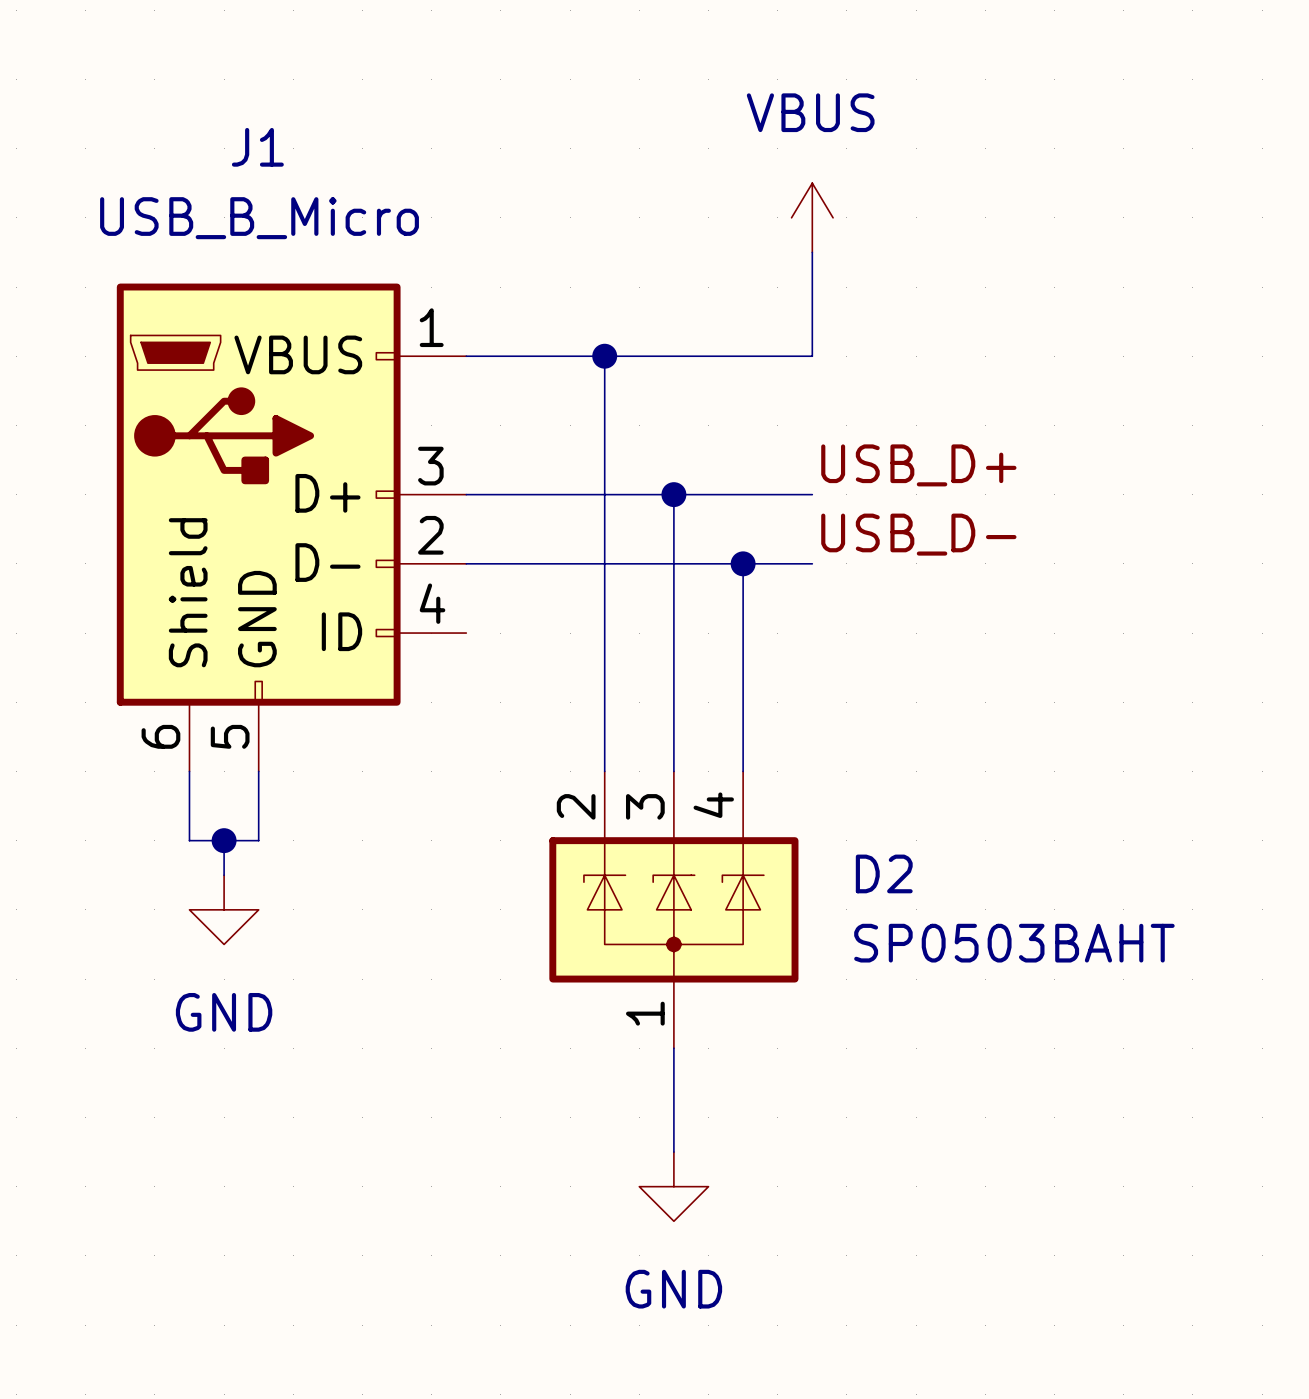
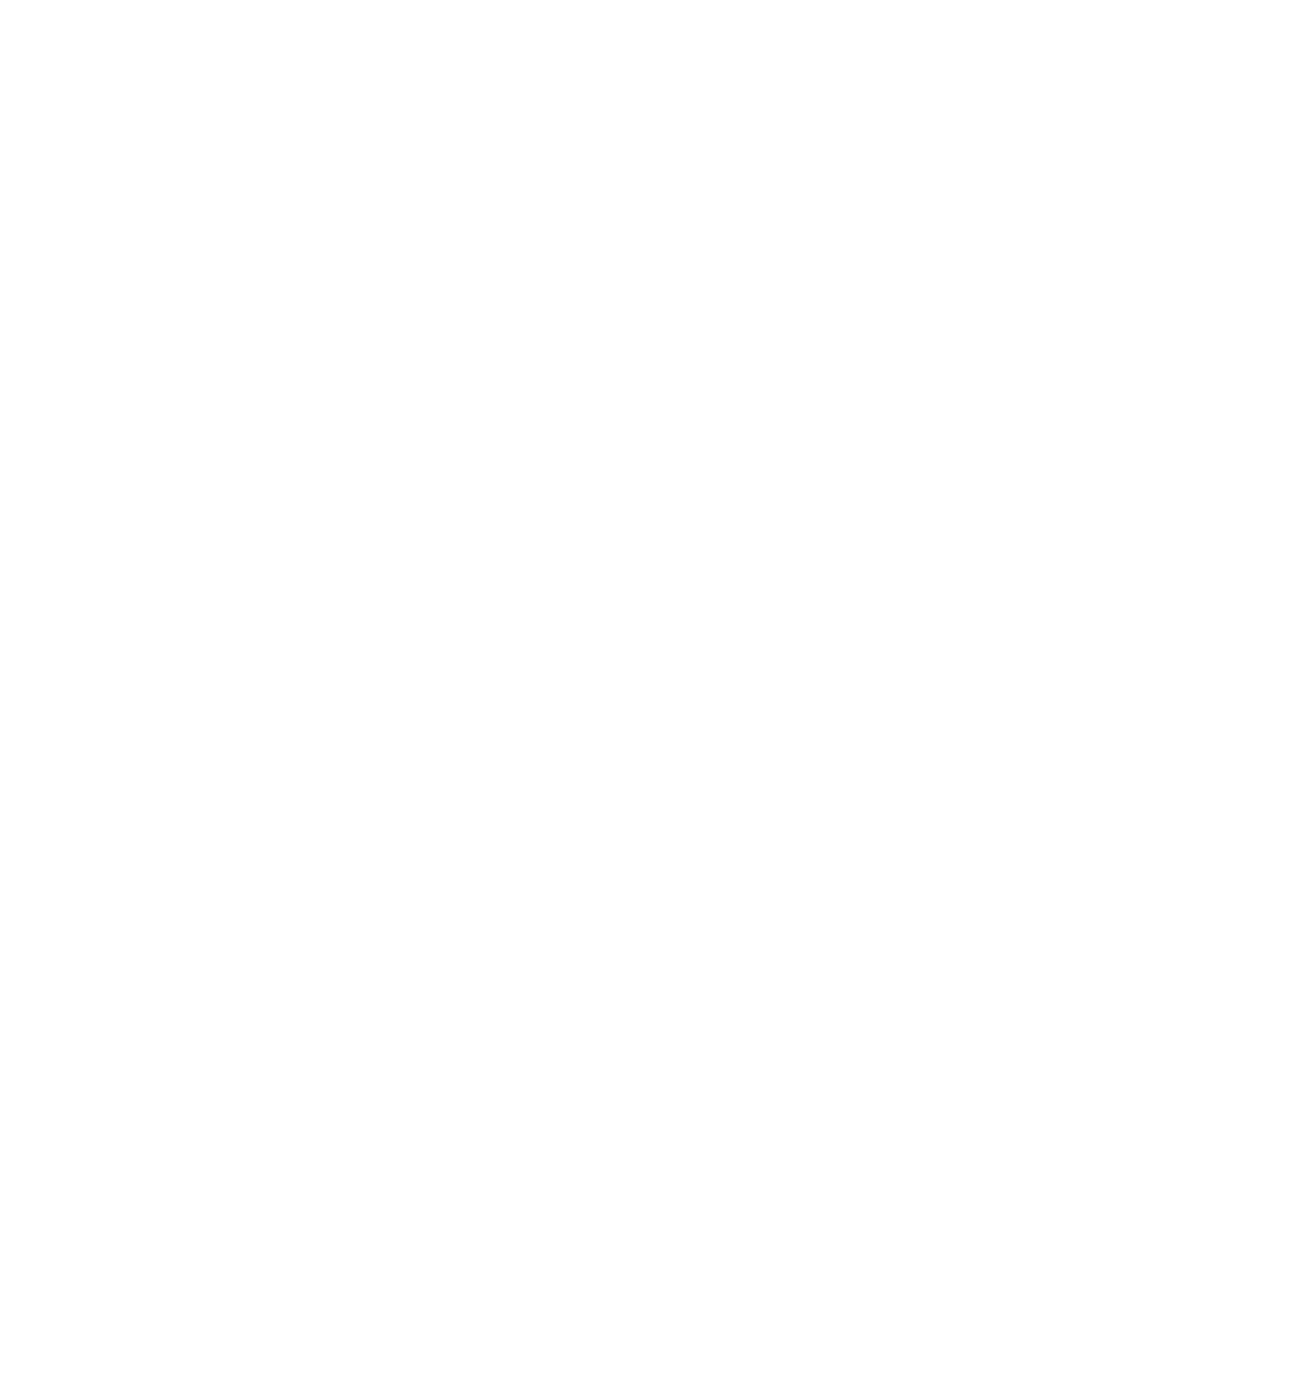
power symbol: VBUS (812, 217) -> none
wire: (812, 252) (812, 356) (466, 356) -> none
wire: (604, 356) (604, 771) -> none
junction: (604, 356) -> none
label: USB_D+ (918, 465) -> none
wire: (466, 494) (812, 494) -> none
wire: (673, 494) (673, 771) -> none
junction: (673, 494) -> none
J1: USB_B_Micro (291, 527) -> none
label: USB_D- (918, 534) -> none
wire: (466, 563) (812, 563) -> none
wire: (743, 563) (743, 771) -> none
junction: (743, 563) -> none
wire: (189, 771) (189, 840) (258, 840) (258, 771) -> none
wire: (224, 840) (224, 875) -> none
junction: (224, 840) -> none
power symbol: GND (224, 909) -> none
D2: SP0503BAHT (673, 909) -> none
wire: (673, 1048) (673, 1152) -> none
power symbol: GND (673, 1186) -> none

